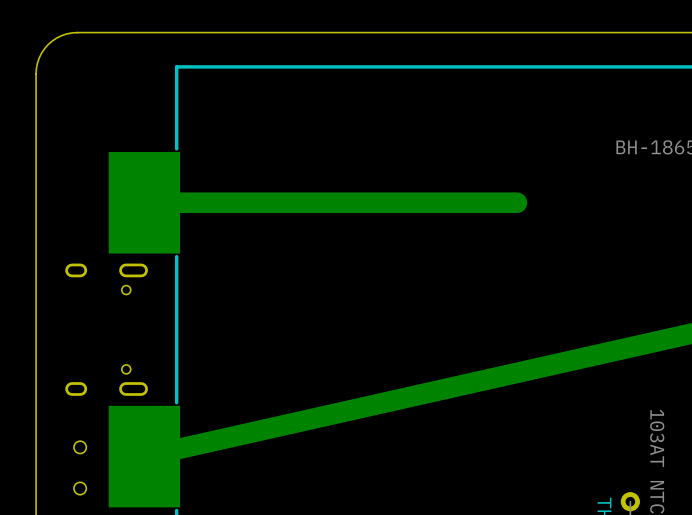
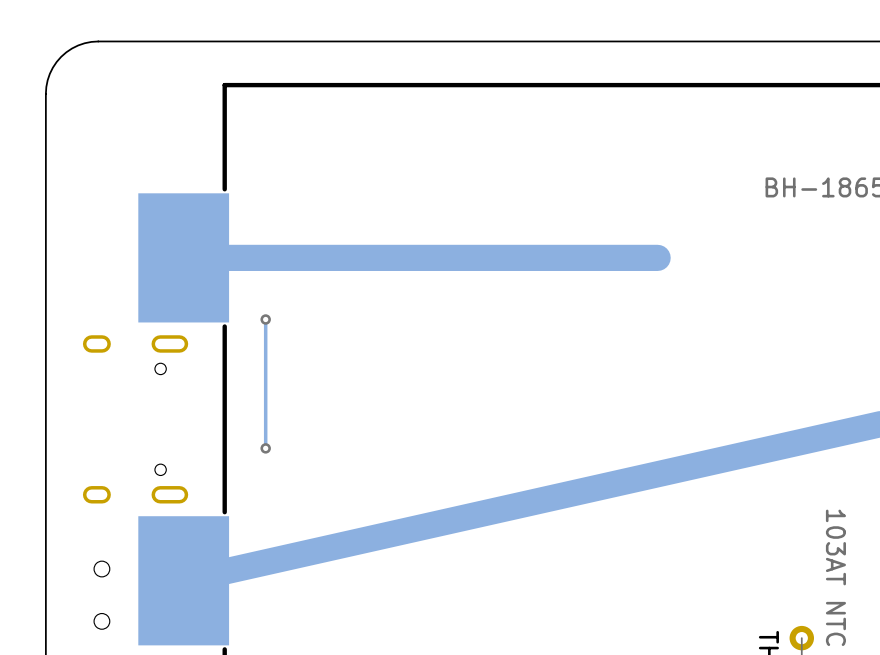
track: none -> (265, 319) (265, 448)
via: none -> (265, 319)
via: none -> (265, 448)

